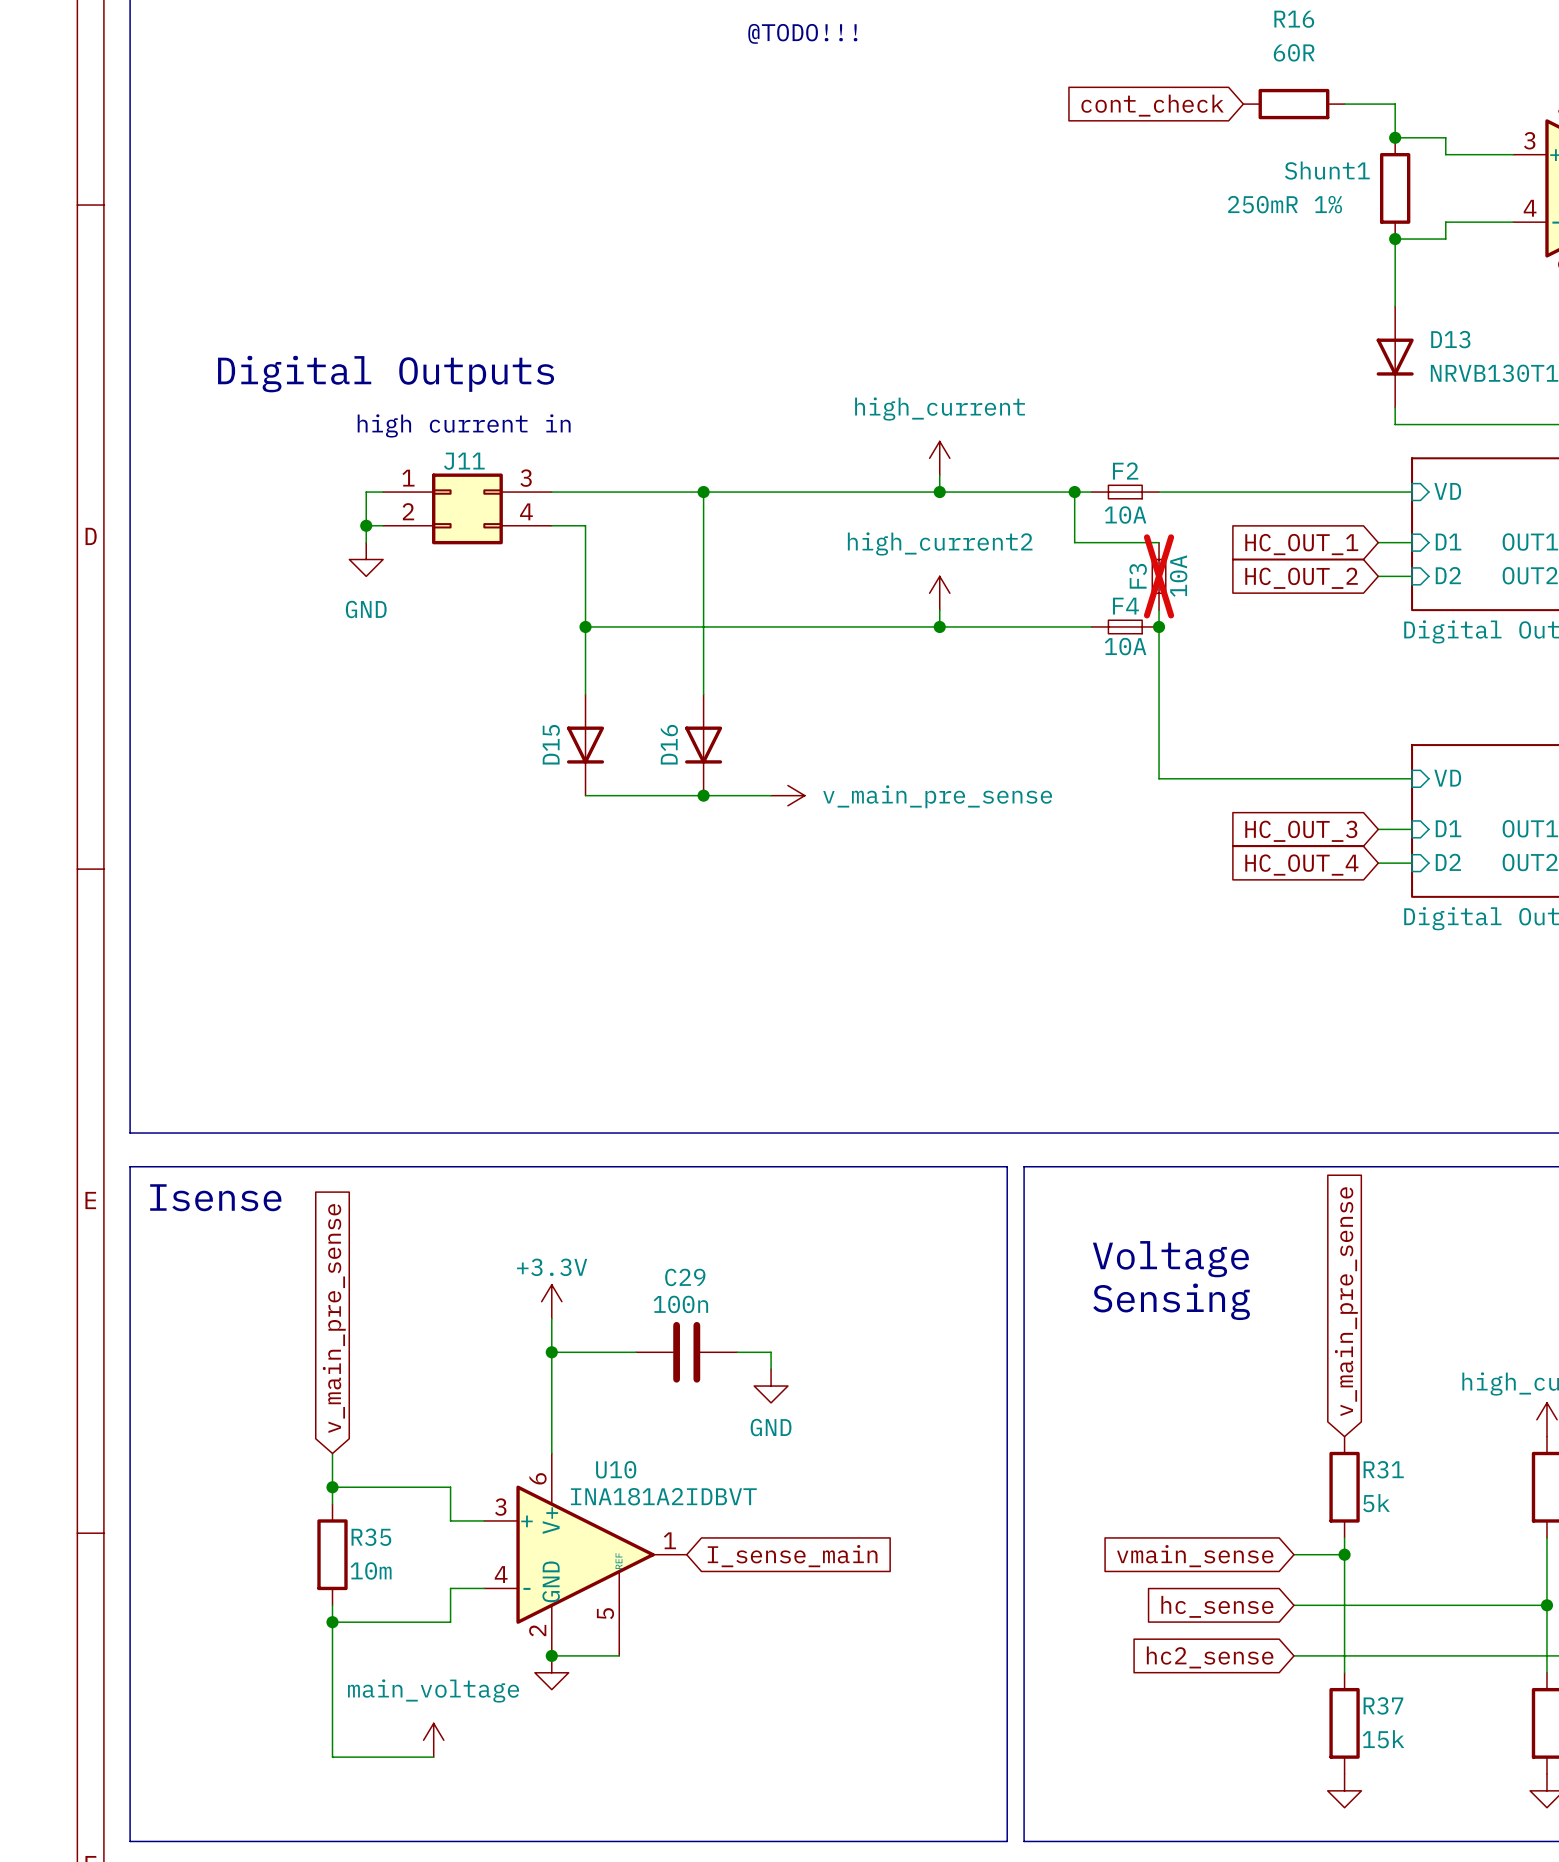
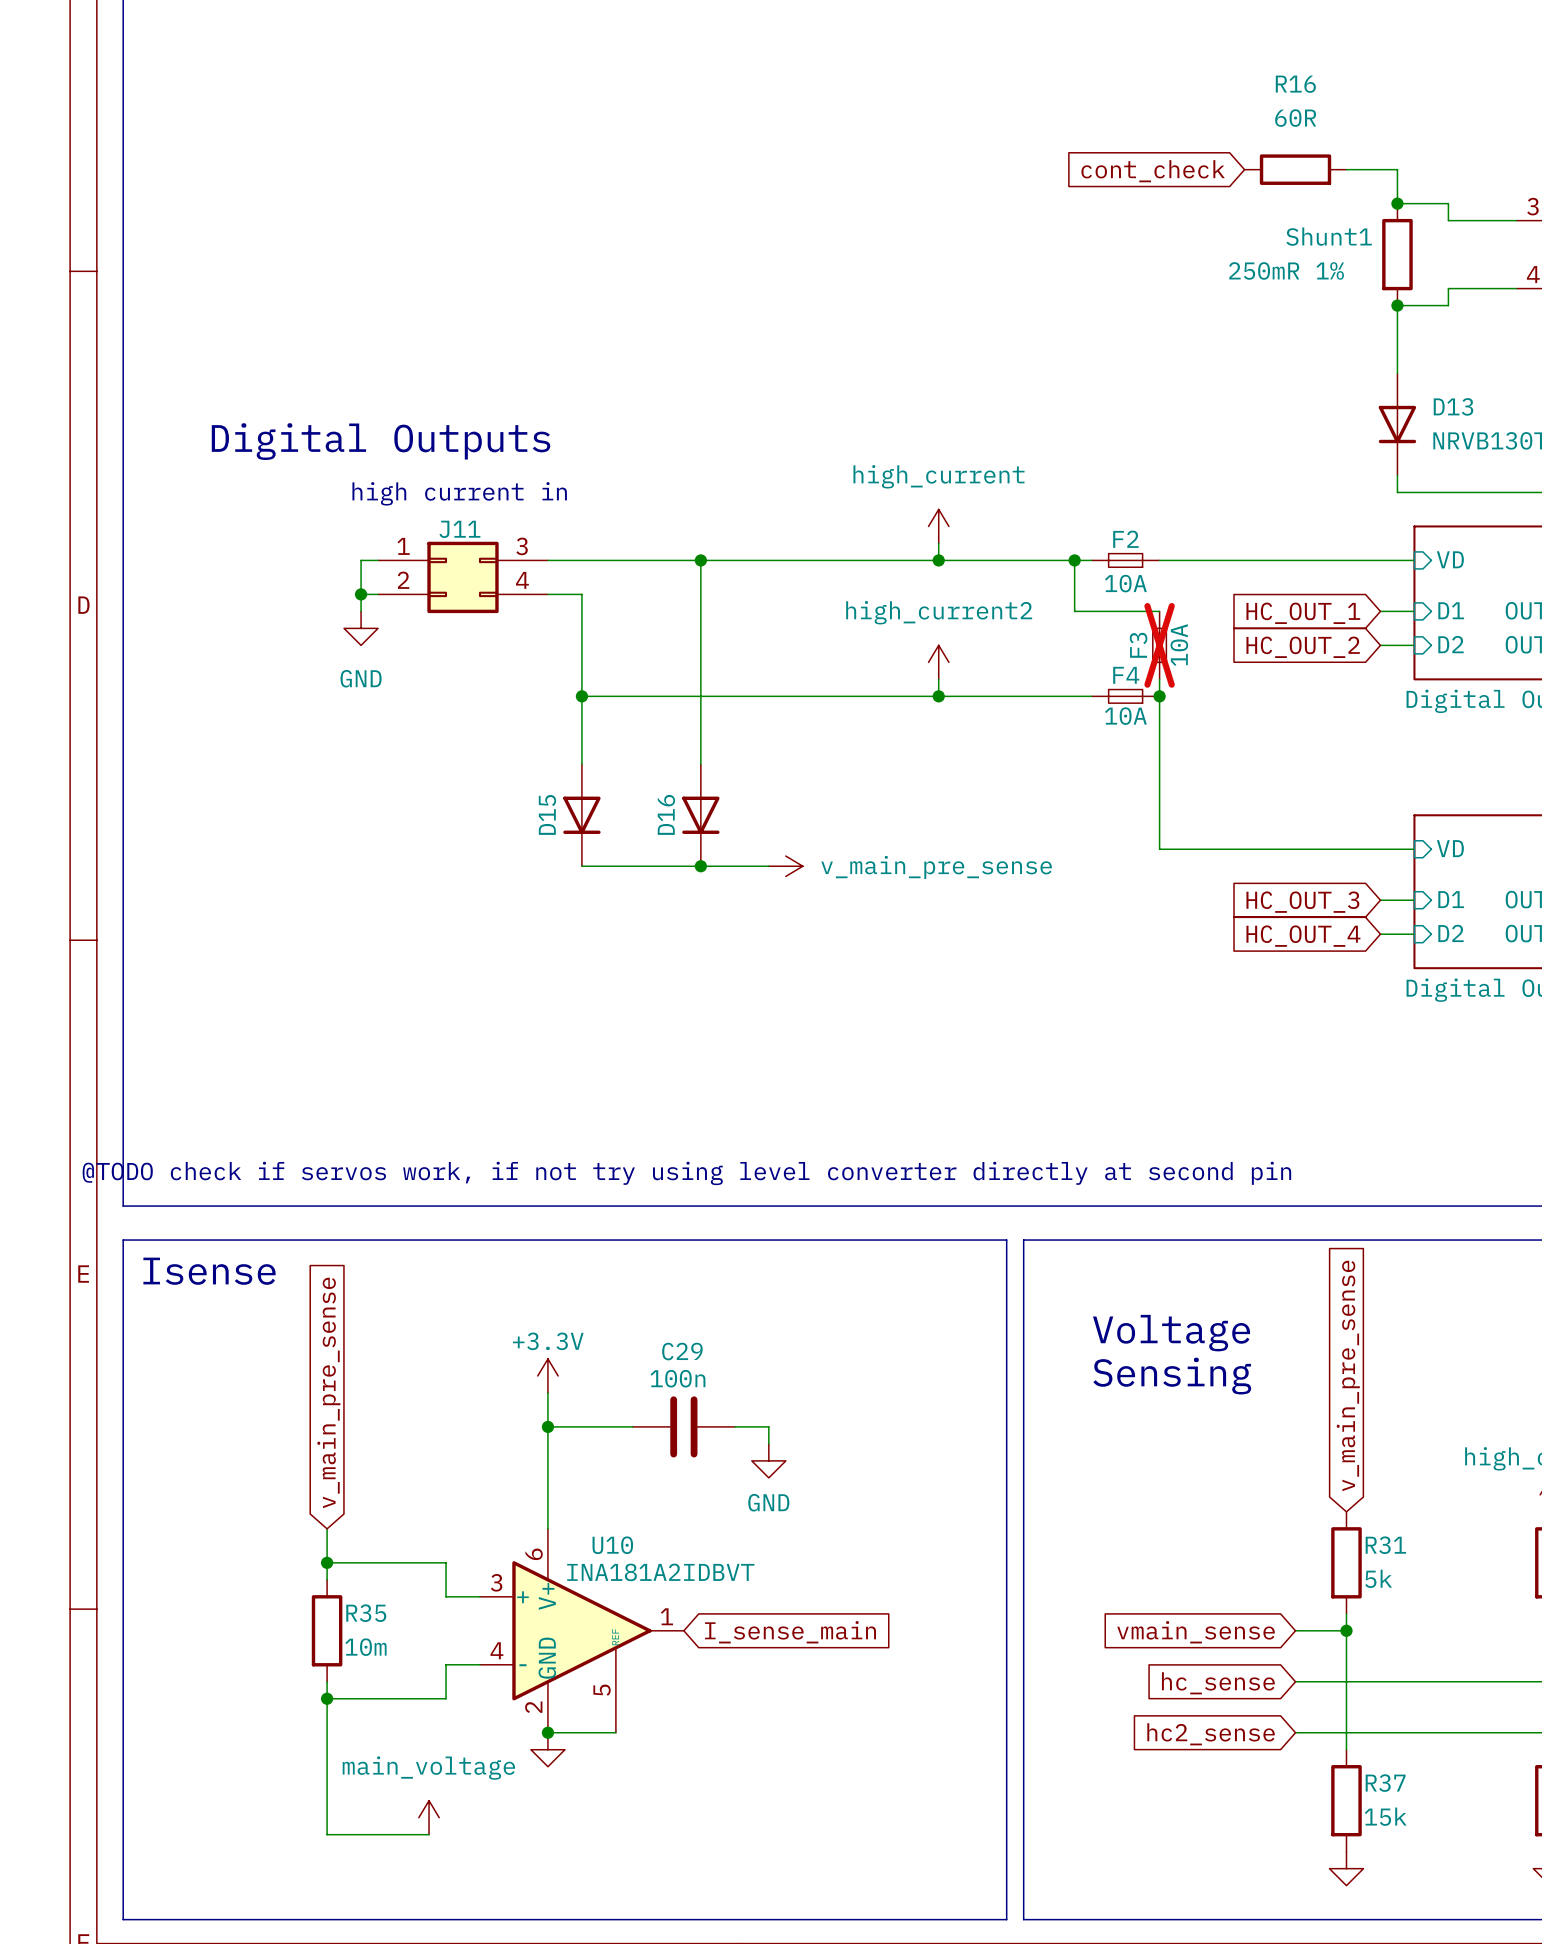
text: @TODO!!! (802, 33) -> none
text: none -> @TODO check if servos work, if not try using level converter directly at second pin (686, 1173)

